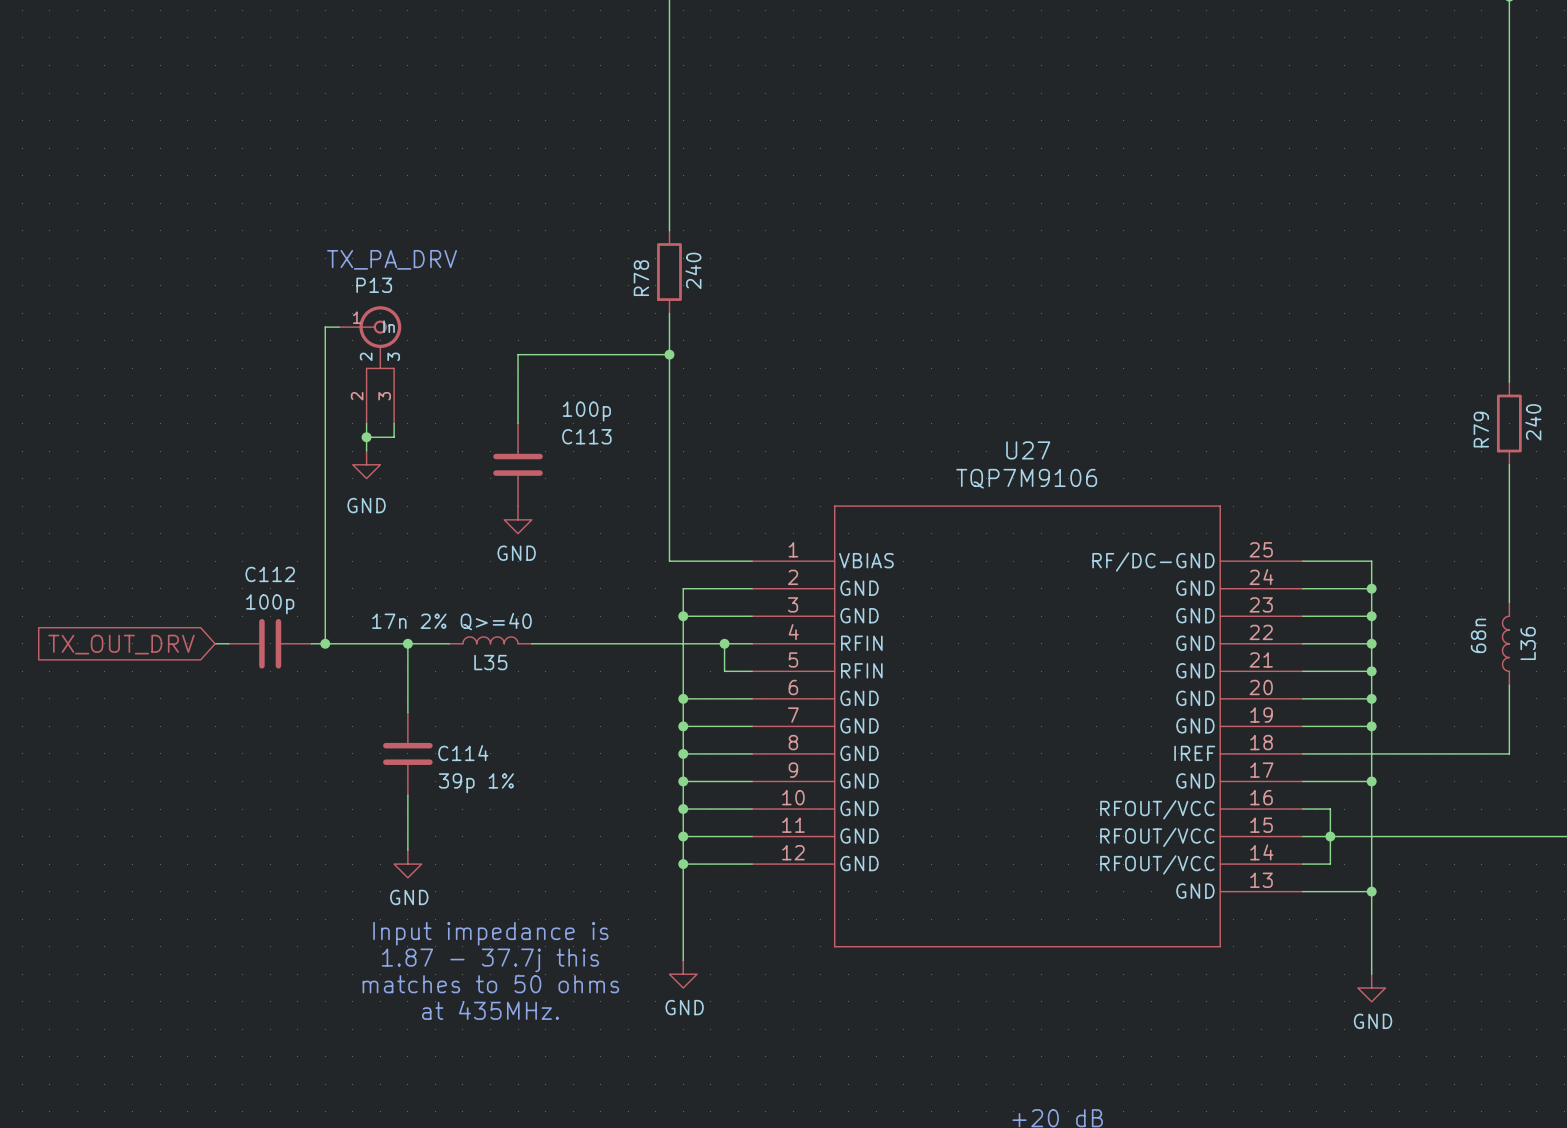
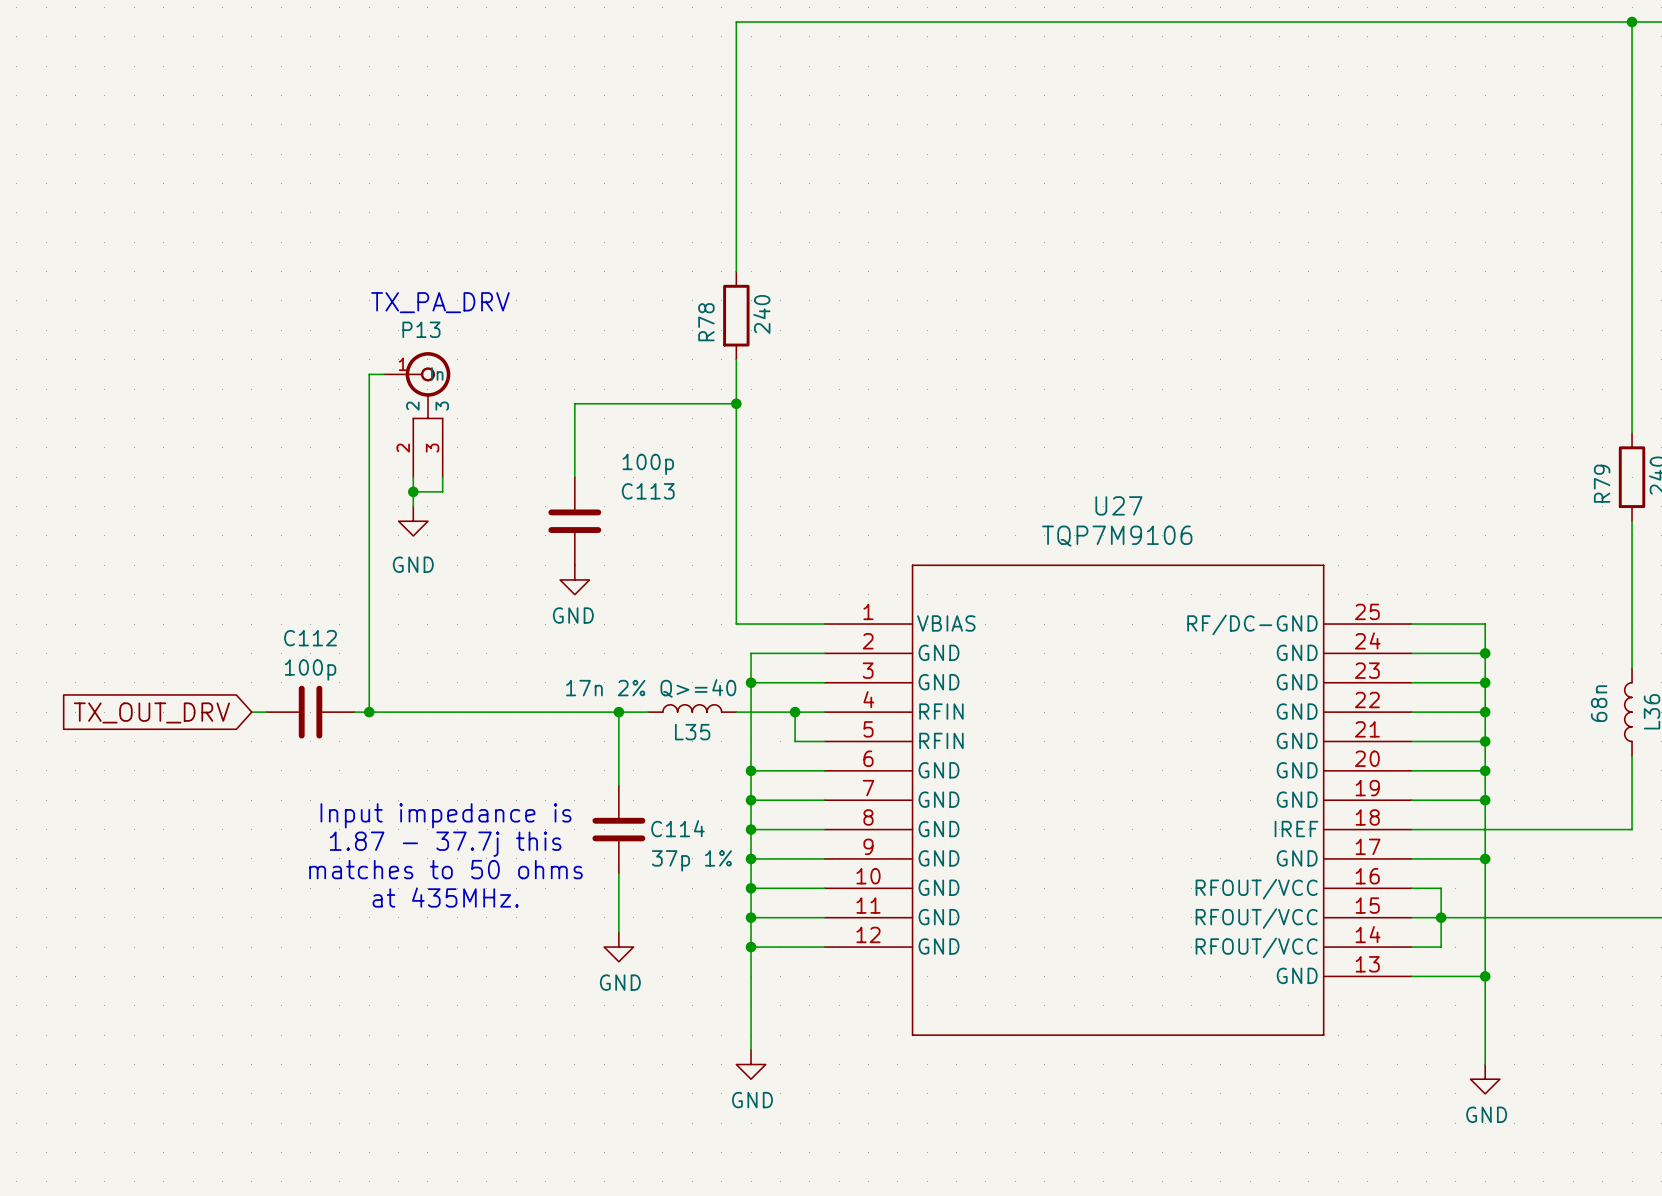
L35 position: (490, 640) -> (692, 708)
wire: (407, 643) (407, 712) -> (618, 712) (618, 785)
junction: (407, 643) -> none
junction: none -> (618, 712)
wire: (586, 643) (669, 643) -> (501, 712) (589, 712)
C114 position: (407, 753) -> (618, 829)
C114 value: 39p 1% (476, 783) -> 37p 1% (691, 860)
wire: (407, 795) (407, 850) -> (618, 873) (618, 932)
power symbol position: GND (407, 864) -> GND (618, 947)
text position: Input impedance is (490, 933) -> Input impedance is (446, 815)
text position: 1.87 - 37.7j this (490, 960) -> 1.87 - 37.7j this (445, 844)
text position: matches to 50 ohms (490, 984) -> matches to 50 ohms (446, 869)
text position: at 435MHz. (490, 1010) -> at 435MHz. (445, 897)

